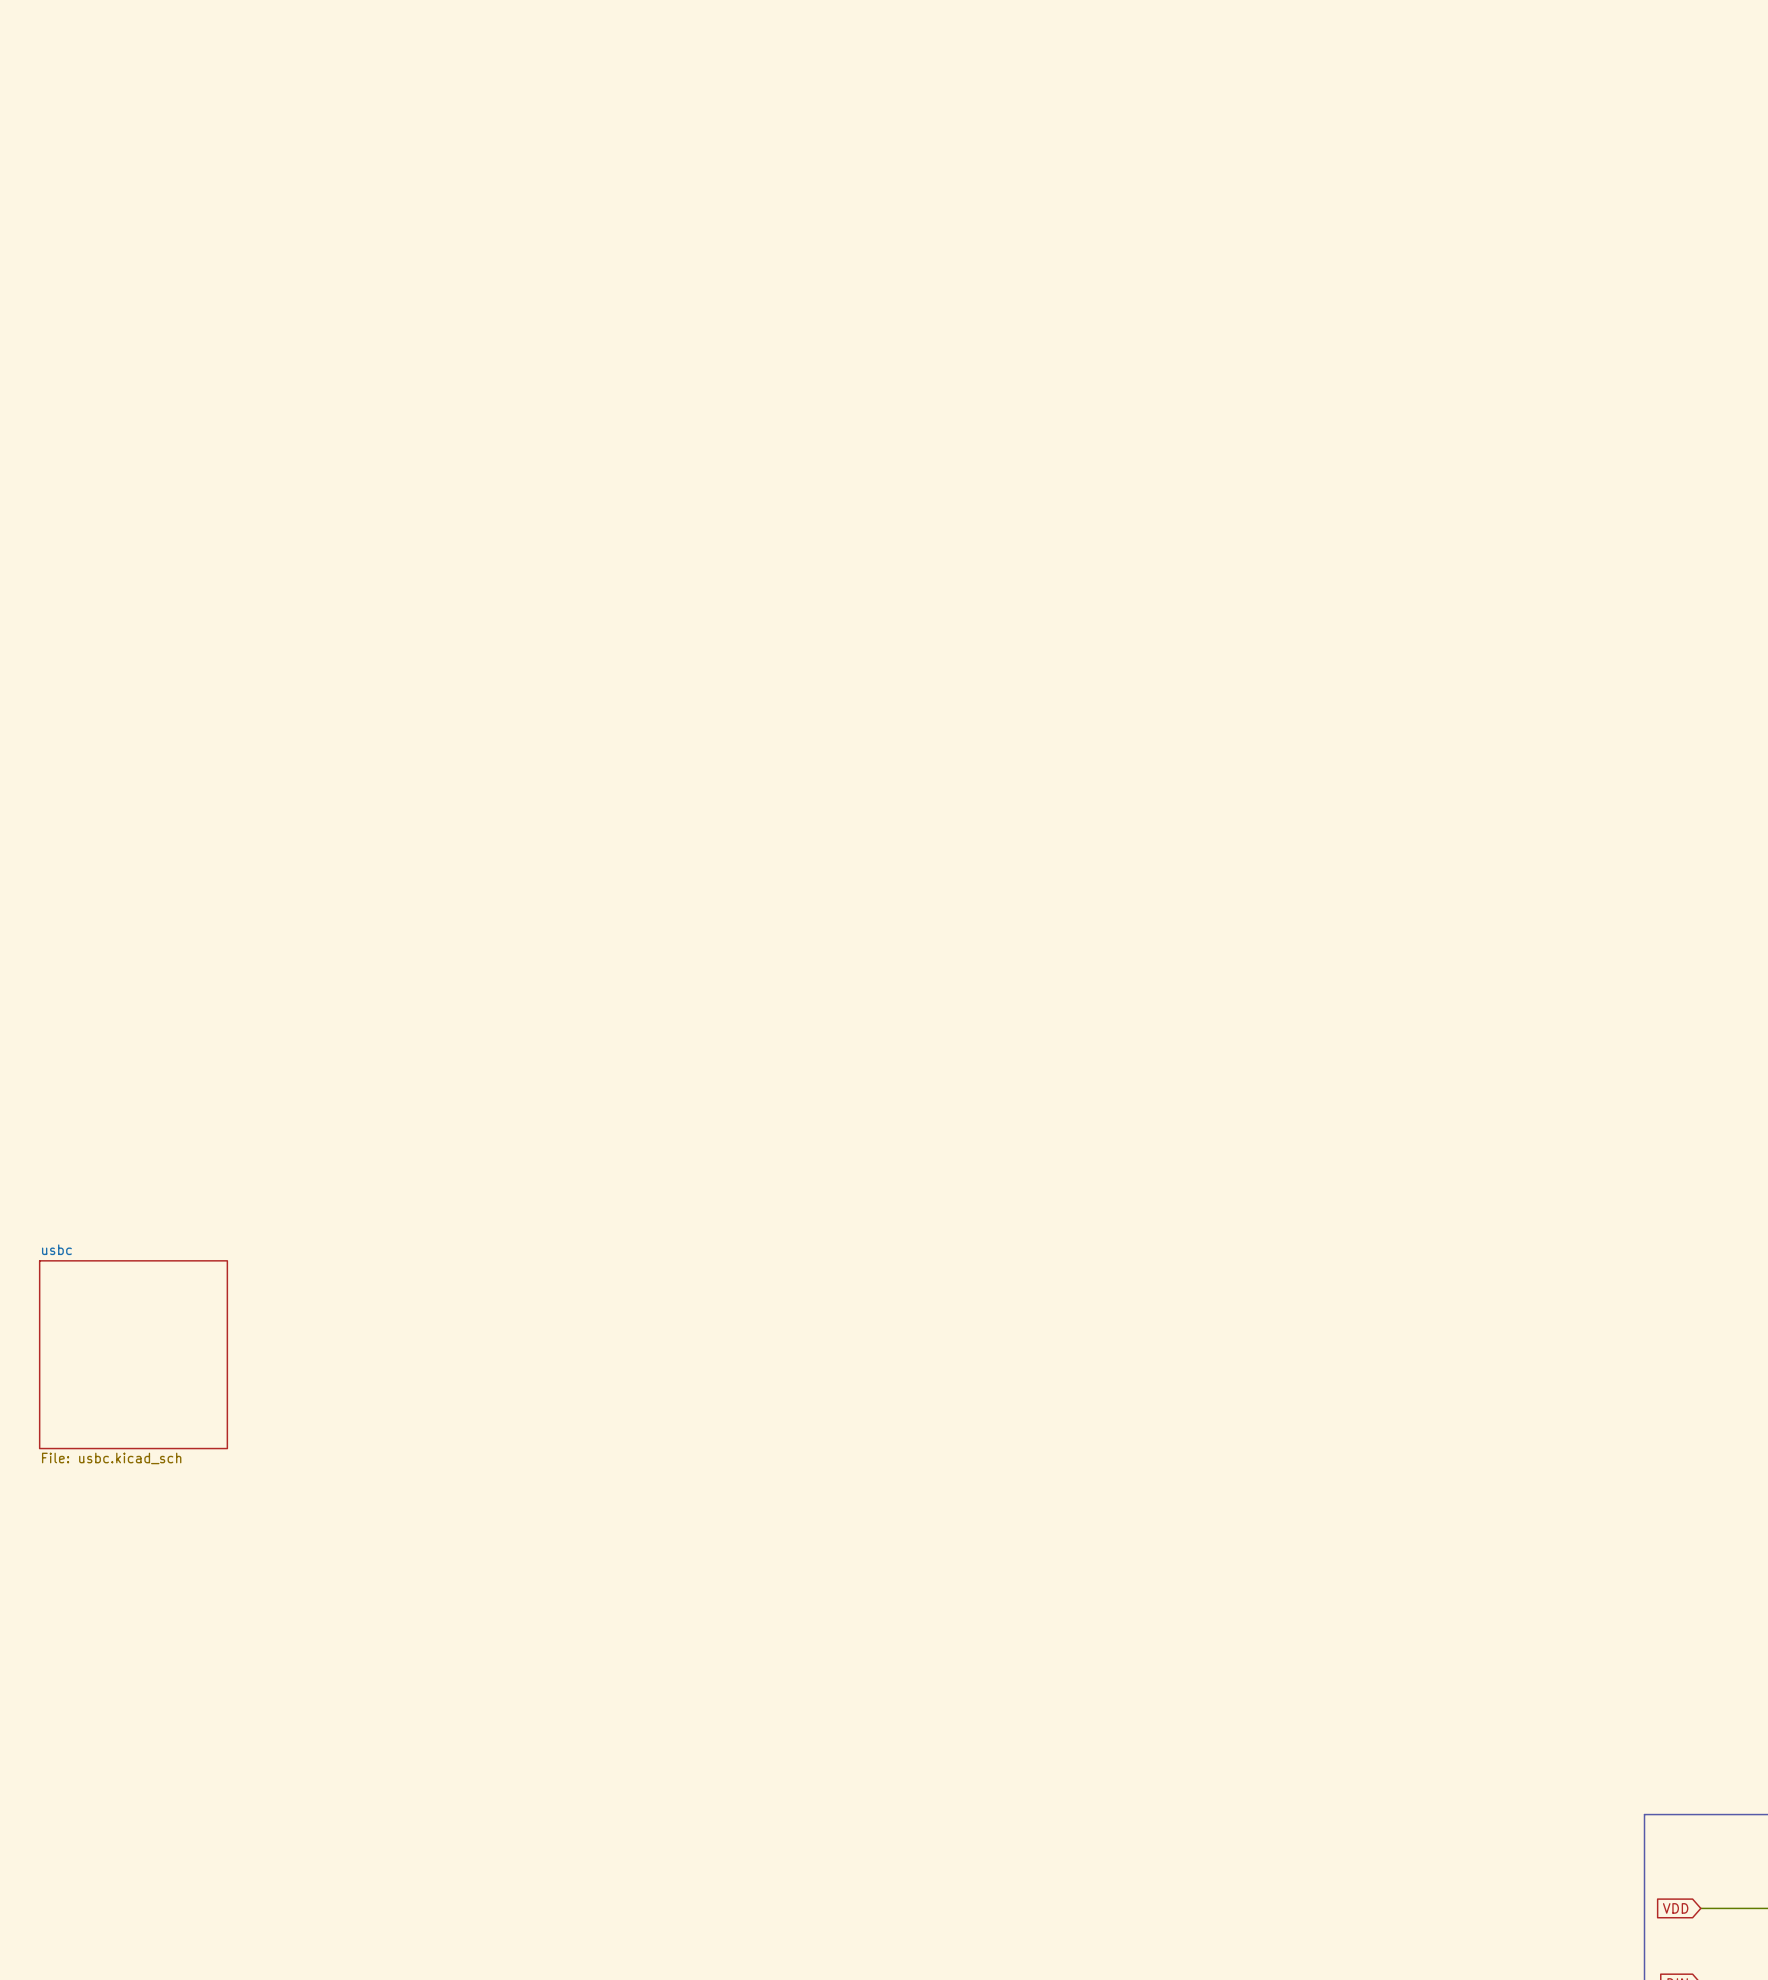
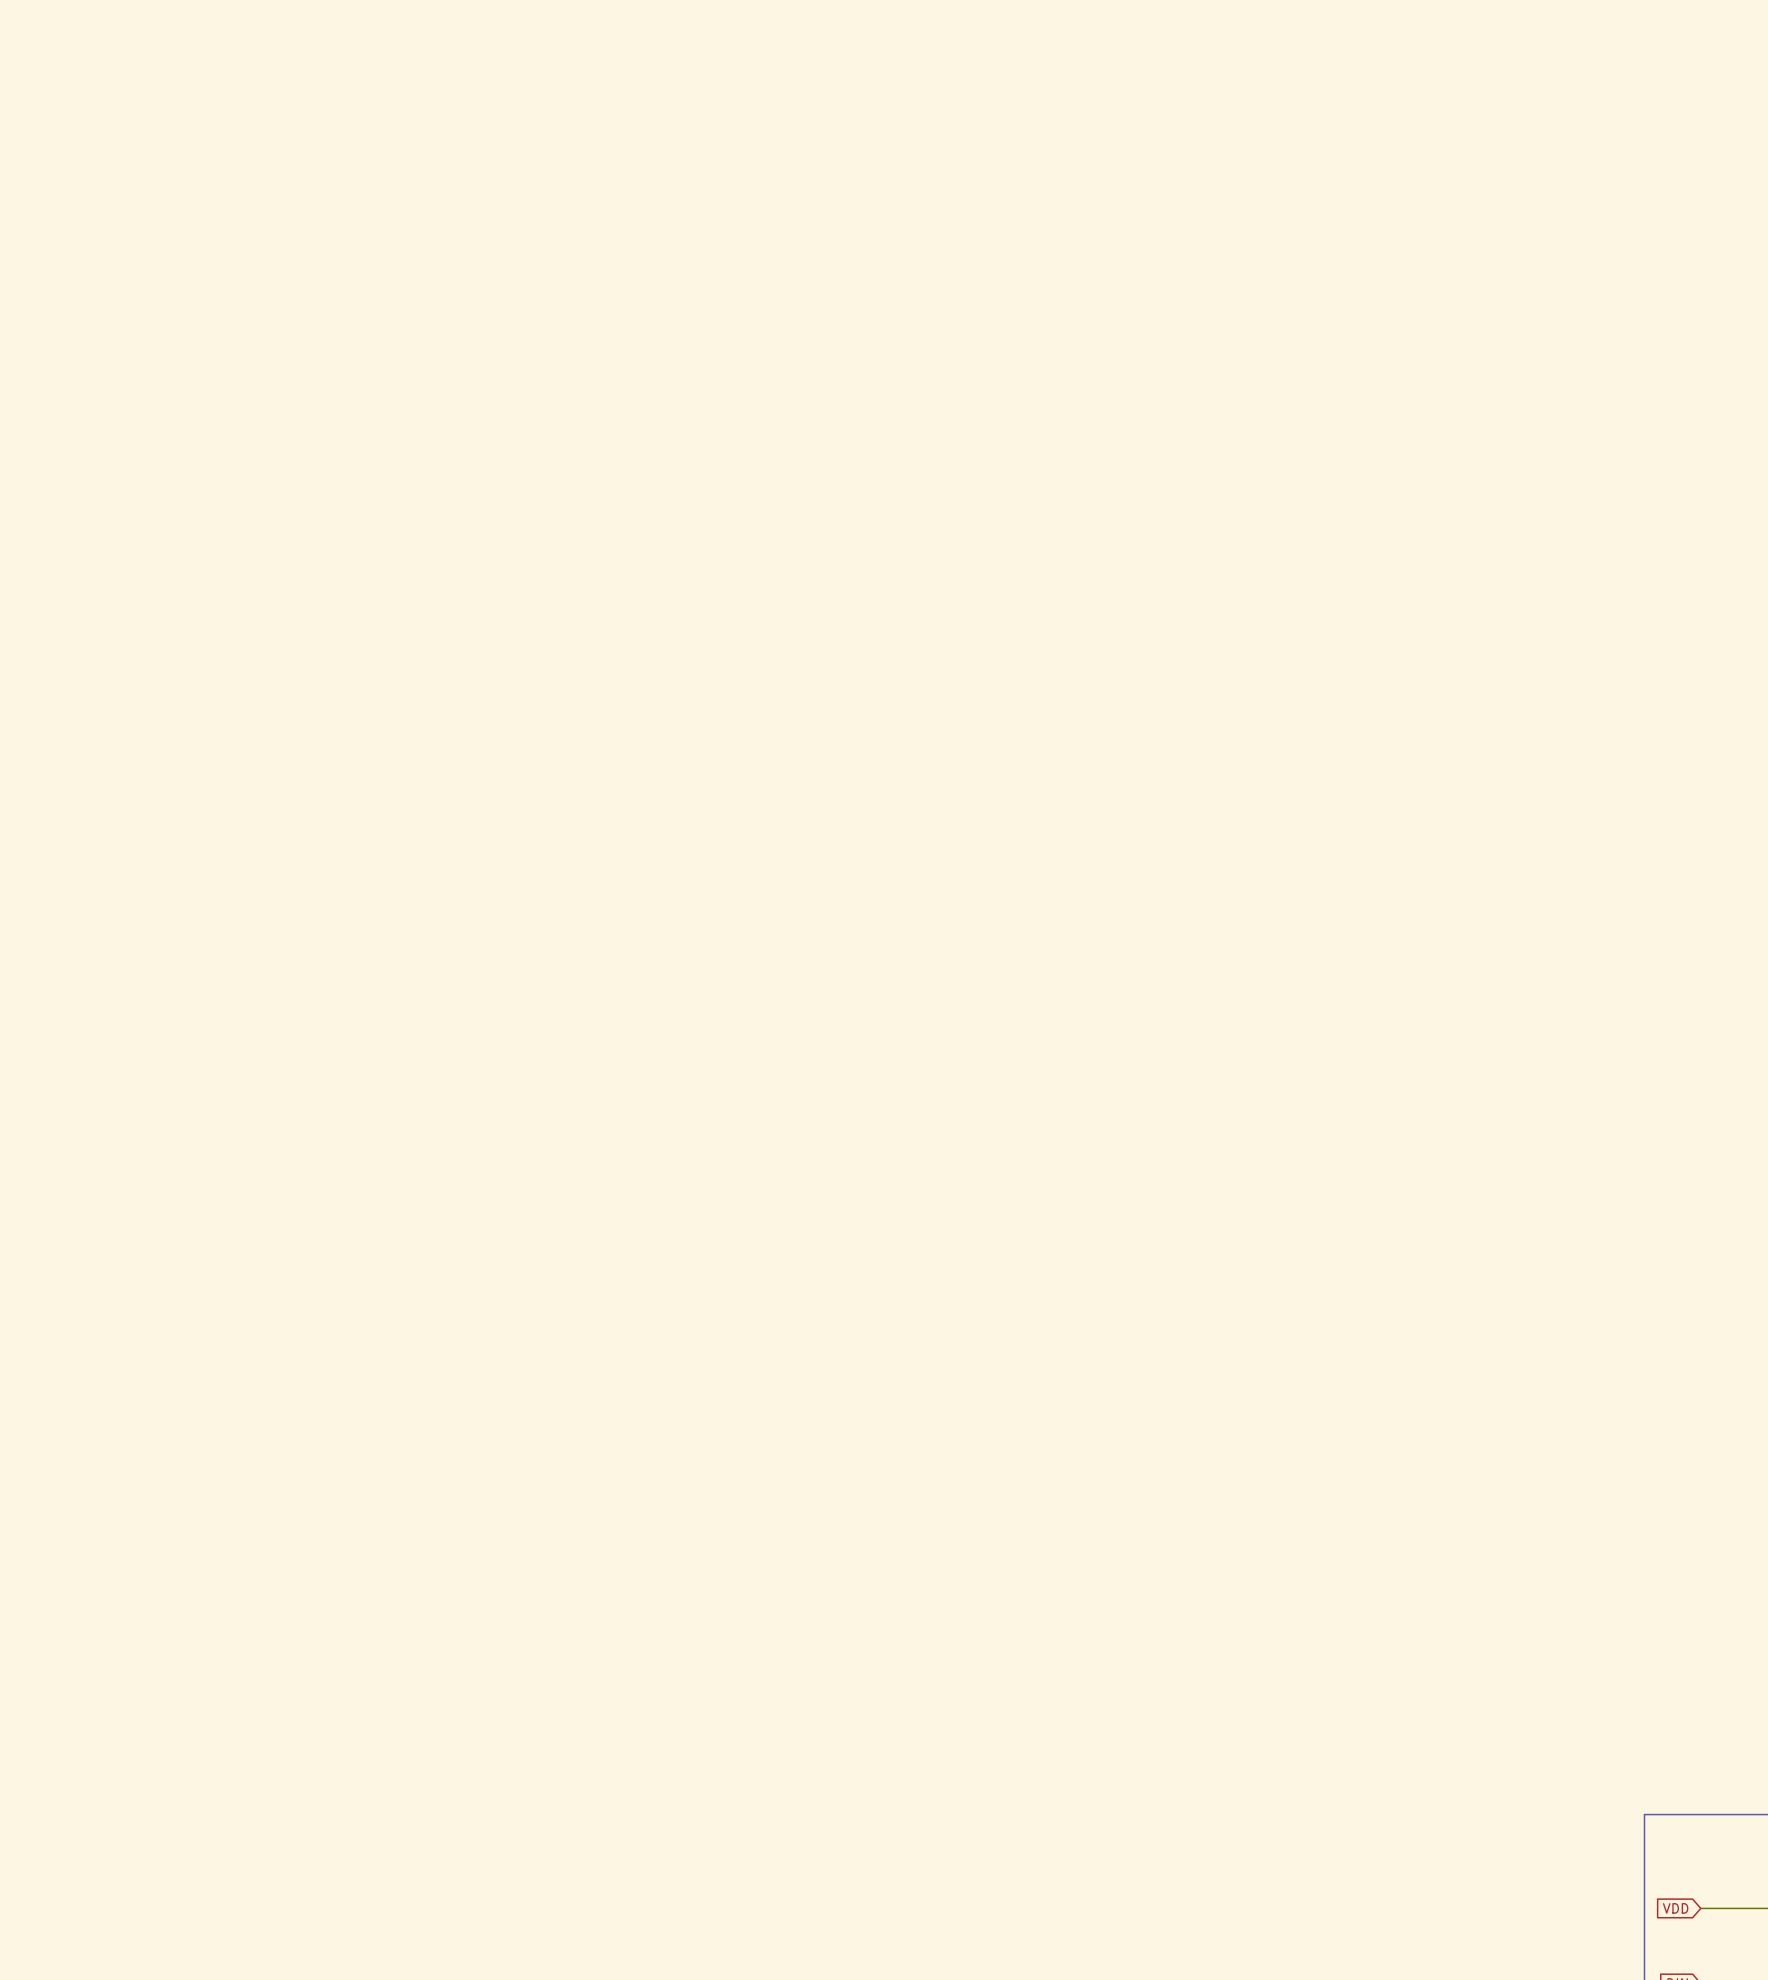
sheet usbc: File: usbc.kicad_sch (133, 1354) -> none

